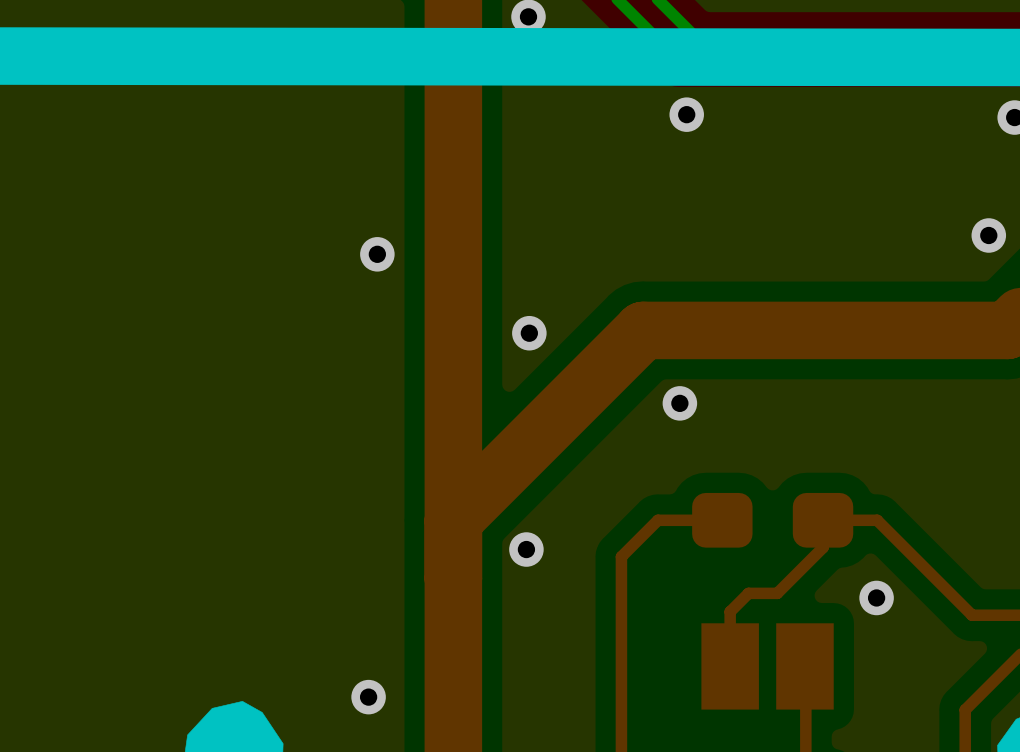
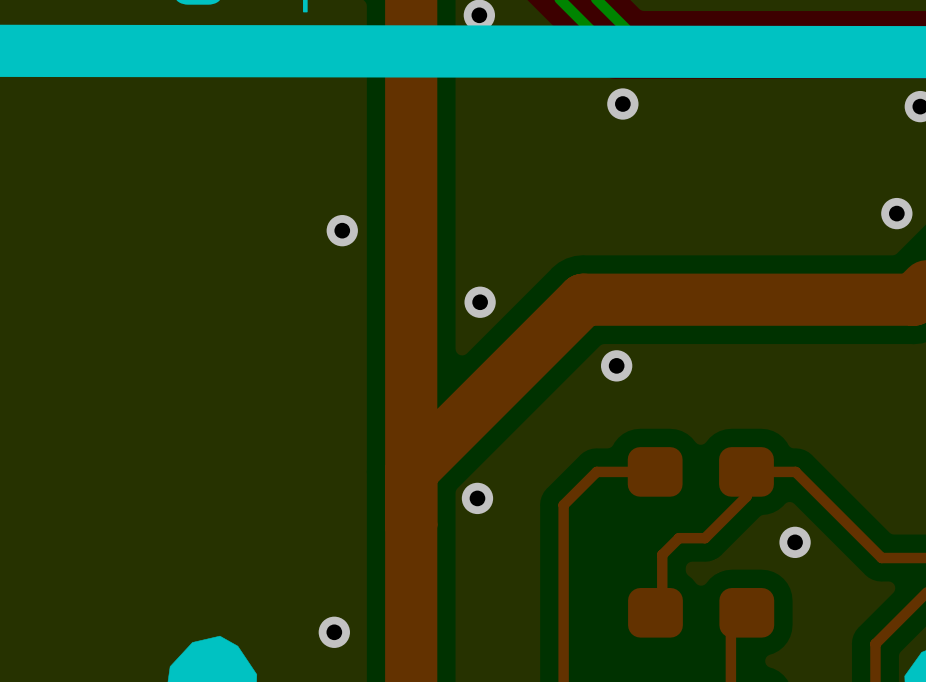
part footprint: [701, 623, 834, 710] -> [628, 588, 775, 638]

